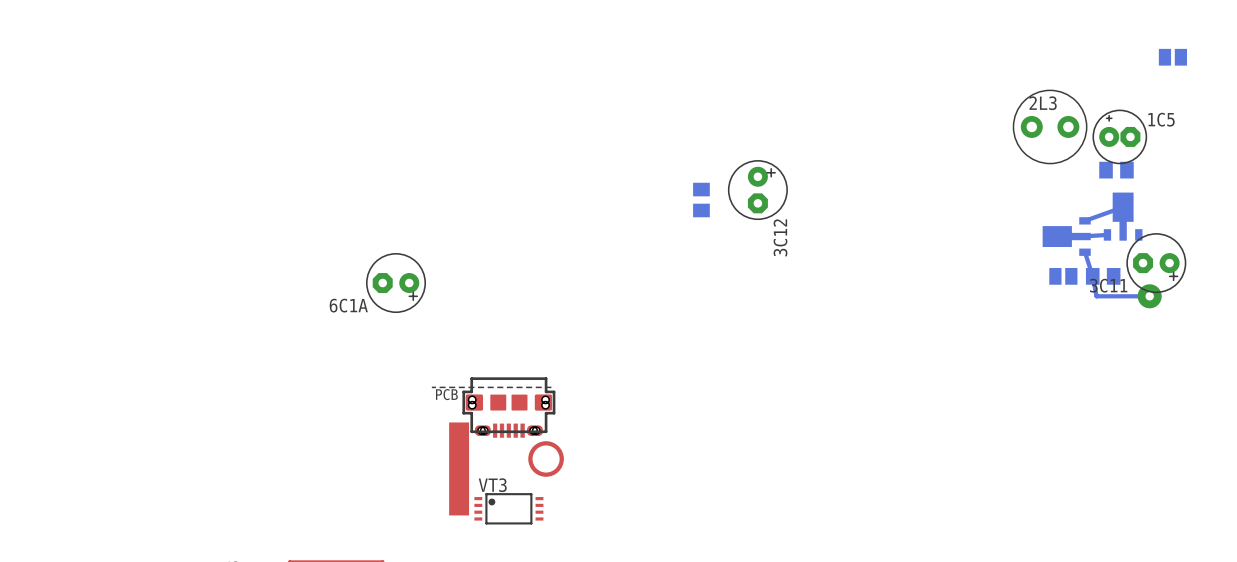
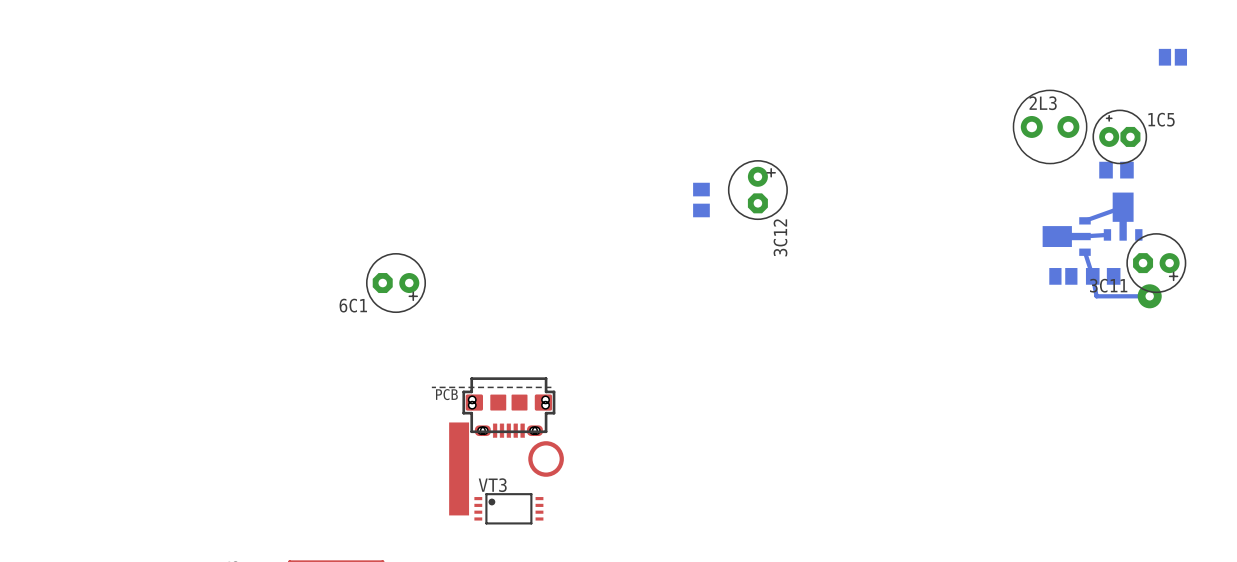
6C1A name: 6C1A (348, 305) -> 6C1 (353, 305)

